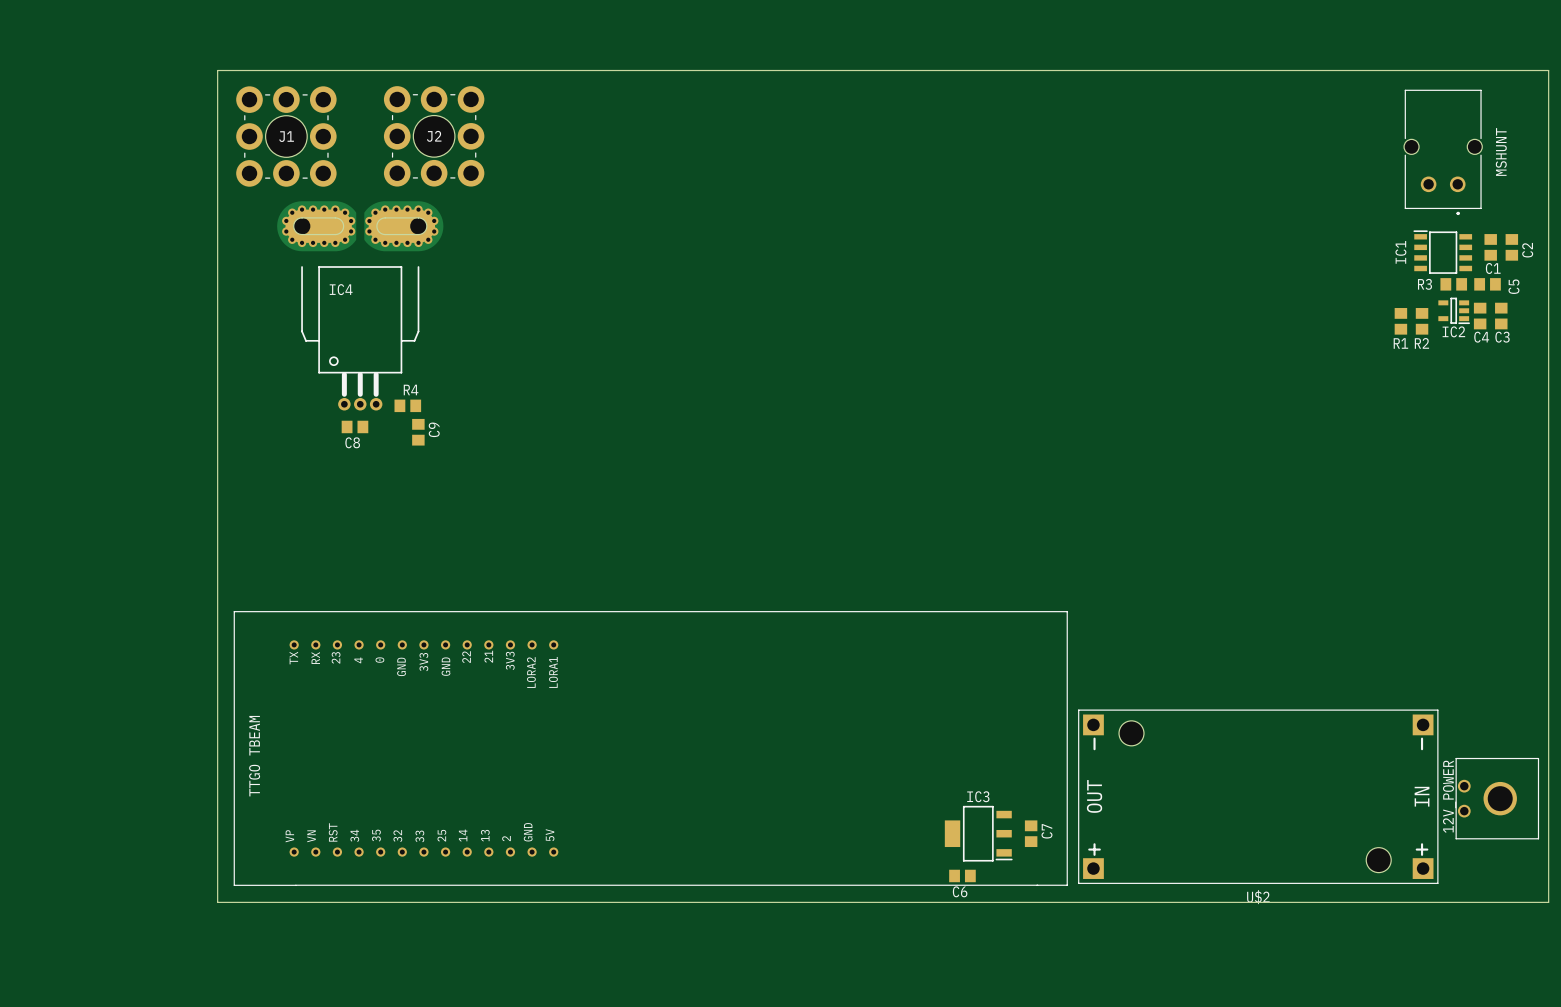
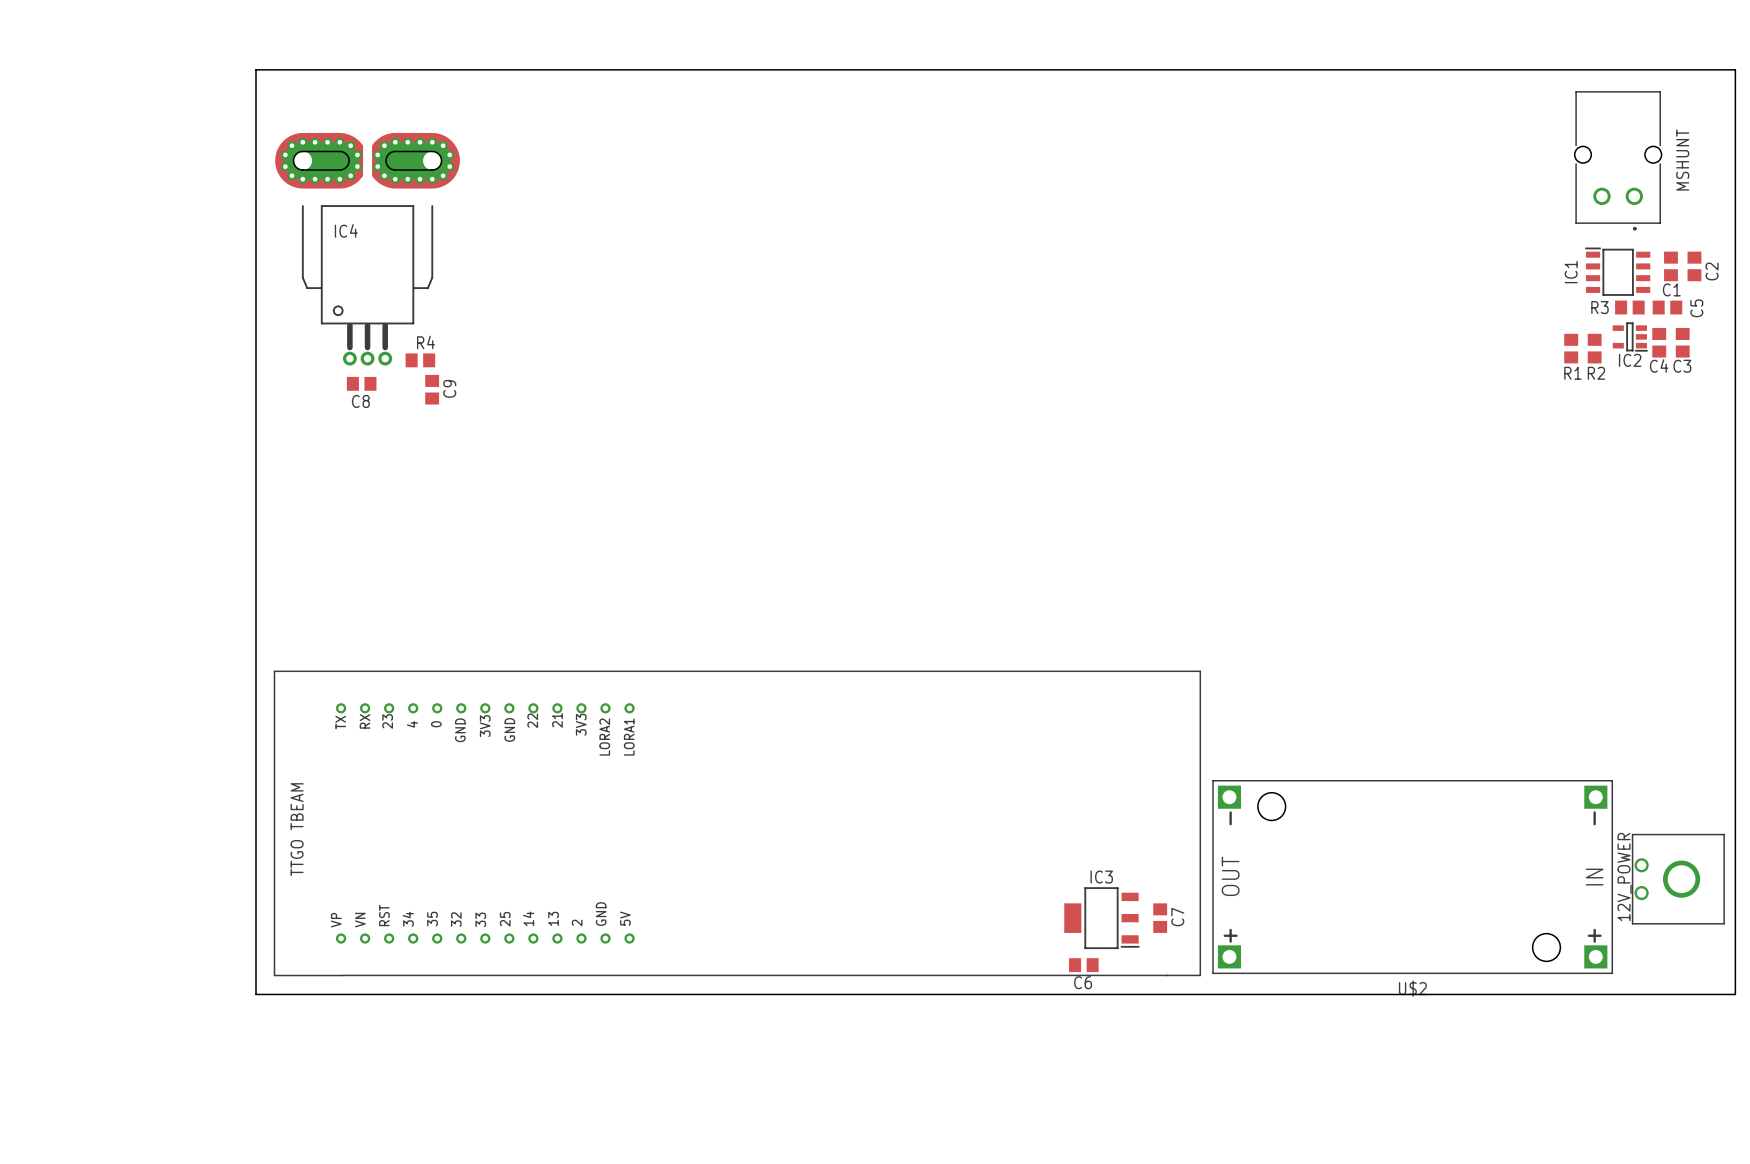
J1: (286, 136) -> none
J2: (434, 136) -> none
IC4 position: (360, 305) -> (367, 249)
R4 position: (407, 405) -> (420, 360)
C8 position: (354, 426) -> (361, 383)
C9 position: (418, 432) -> (432, 389)

